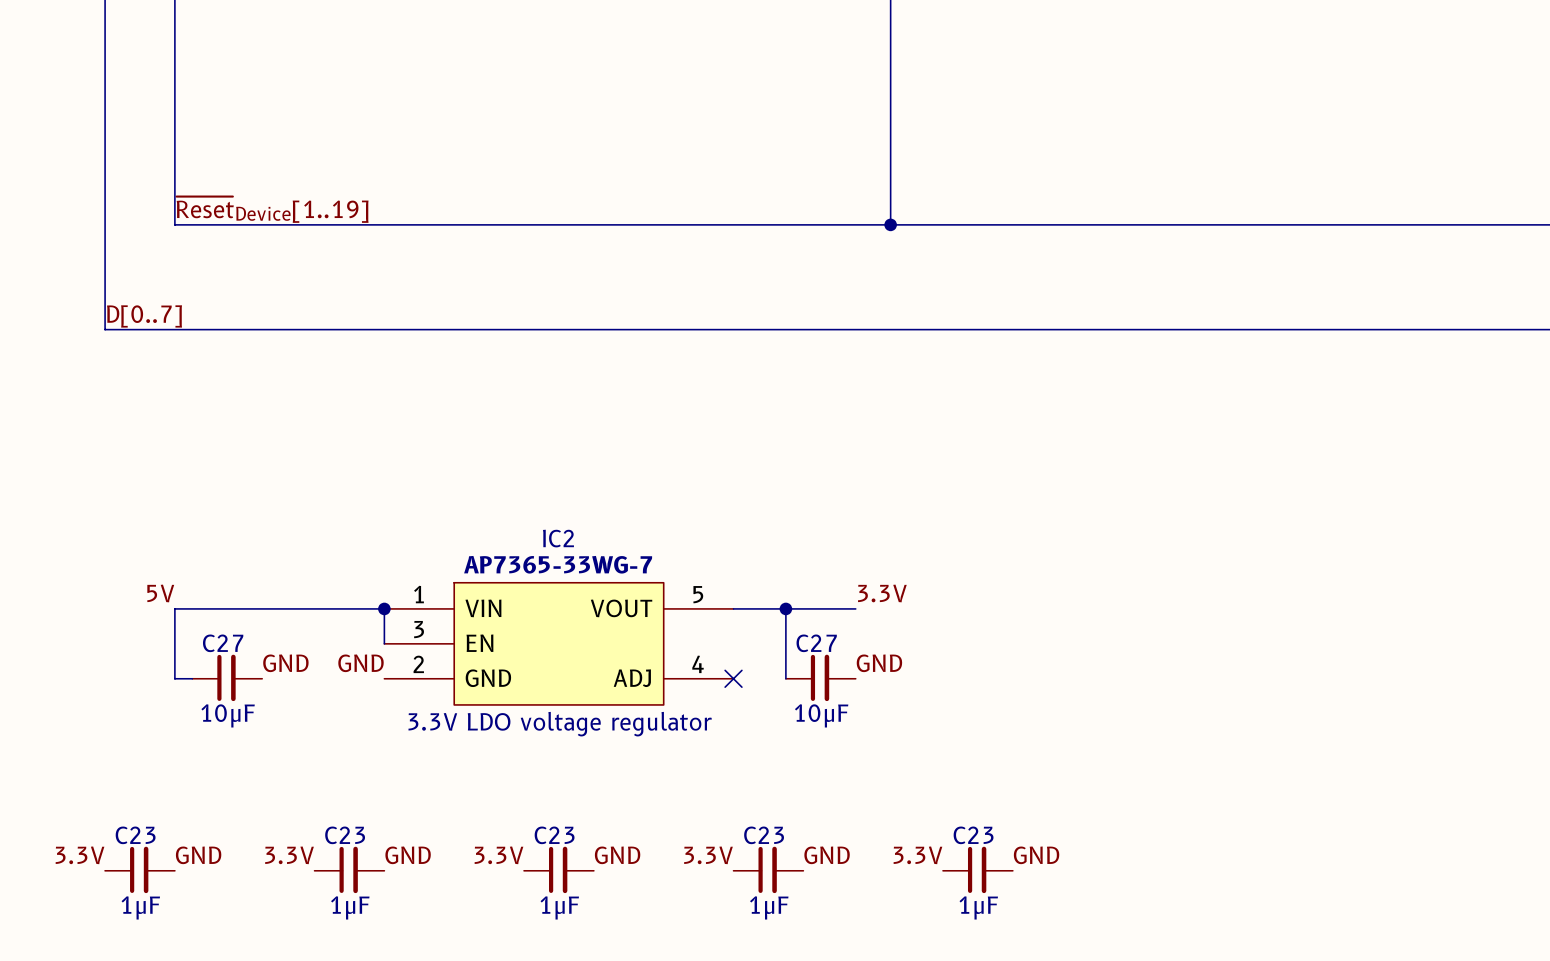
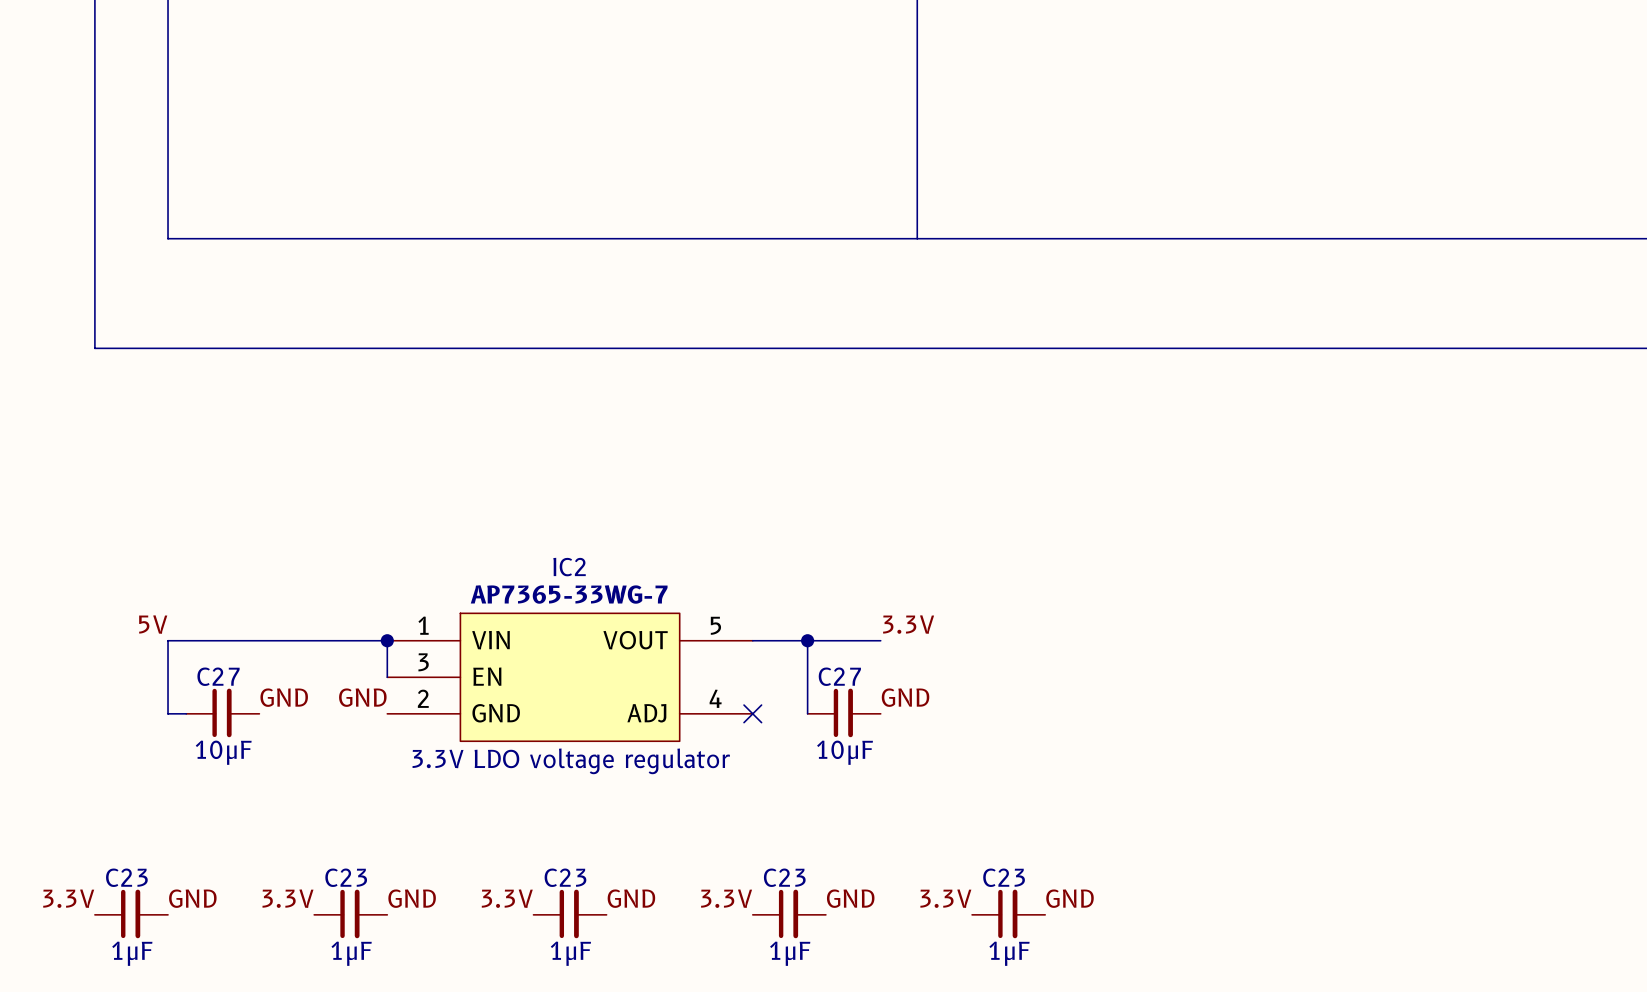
label: ~{Reset}Device[1..19] (272, 209) -> none
junction: (890, 224) -> none
label: D[0..7] (144, 316) -> none

